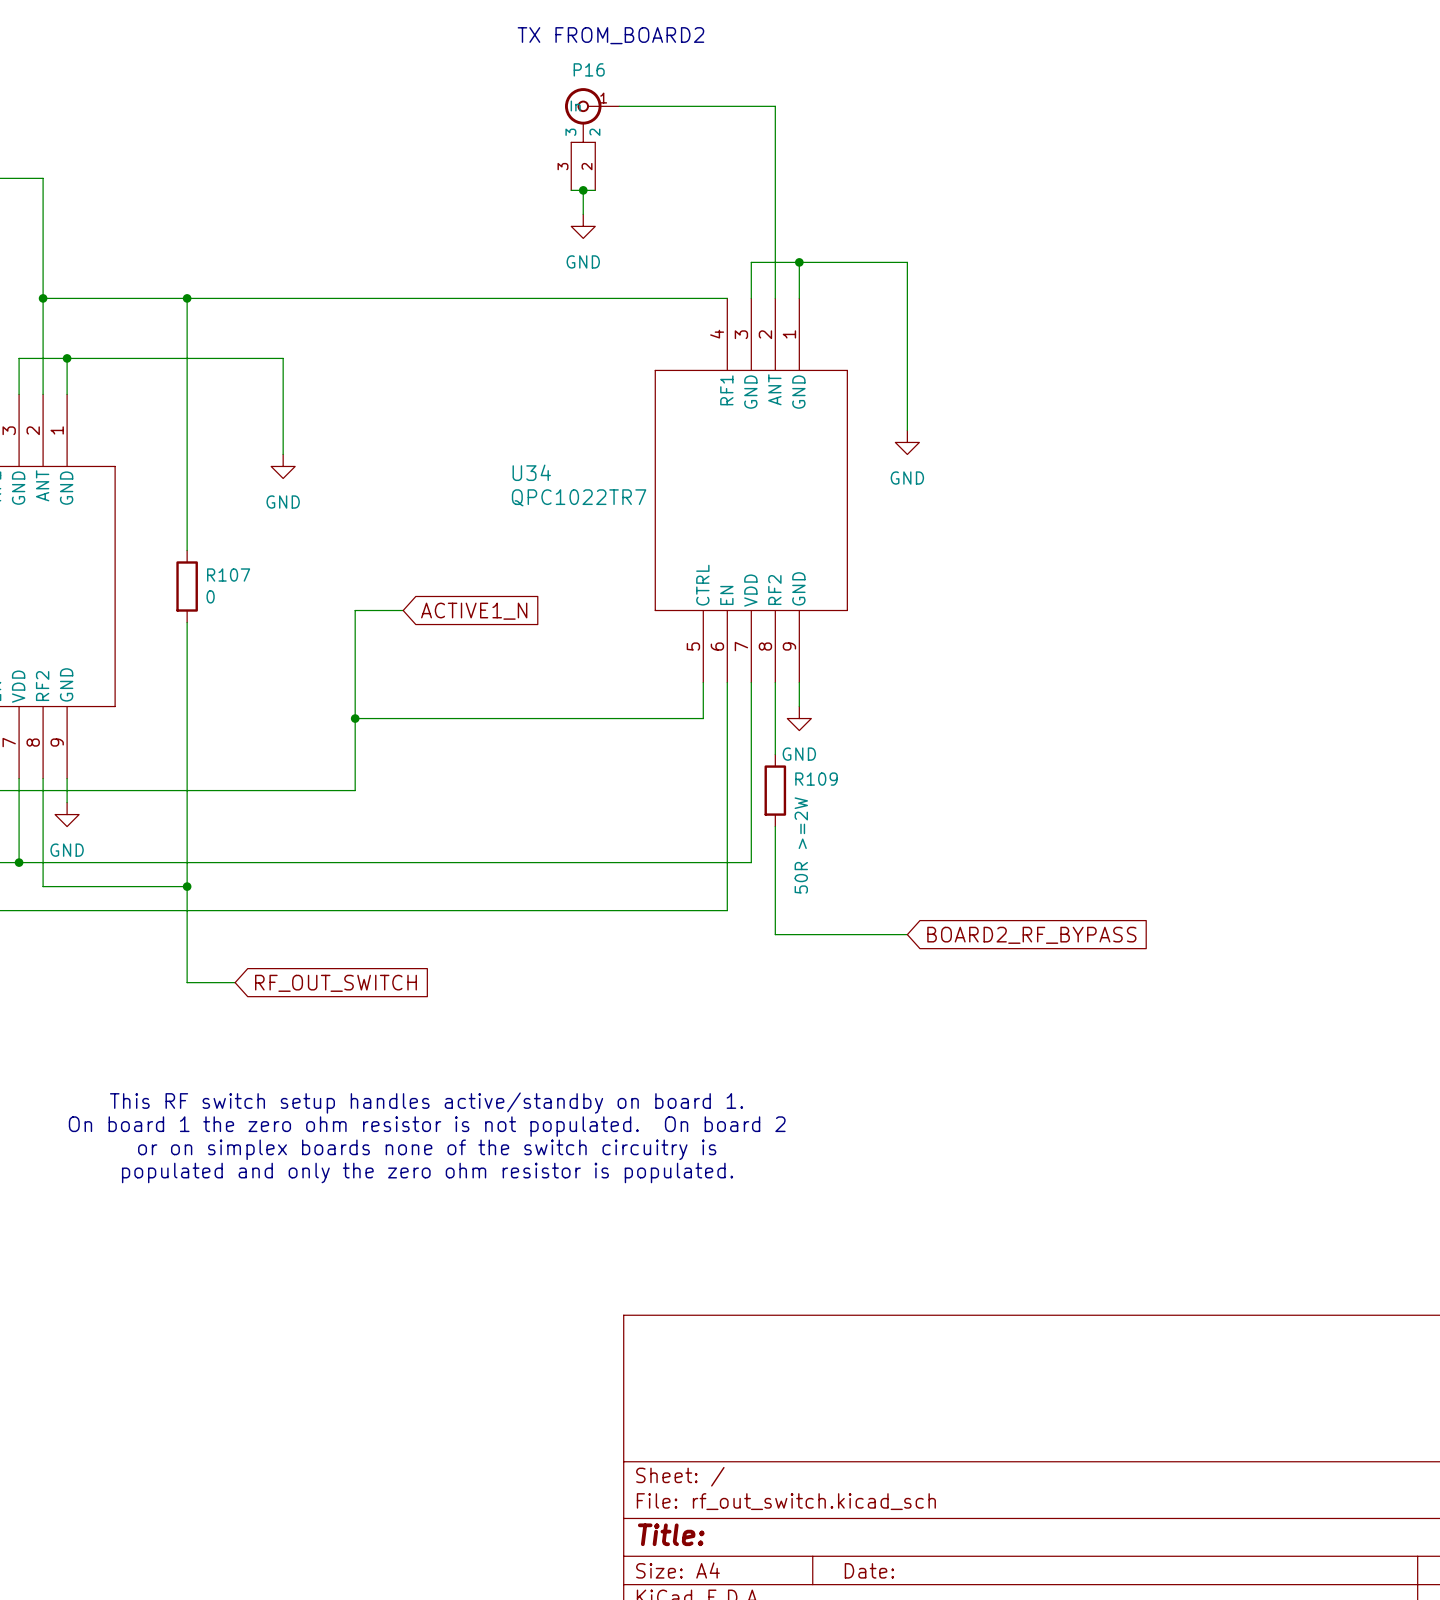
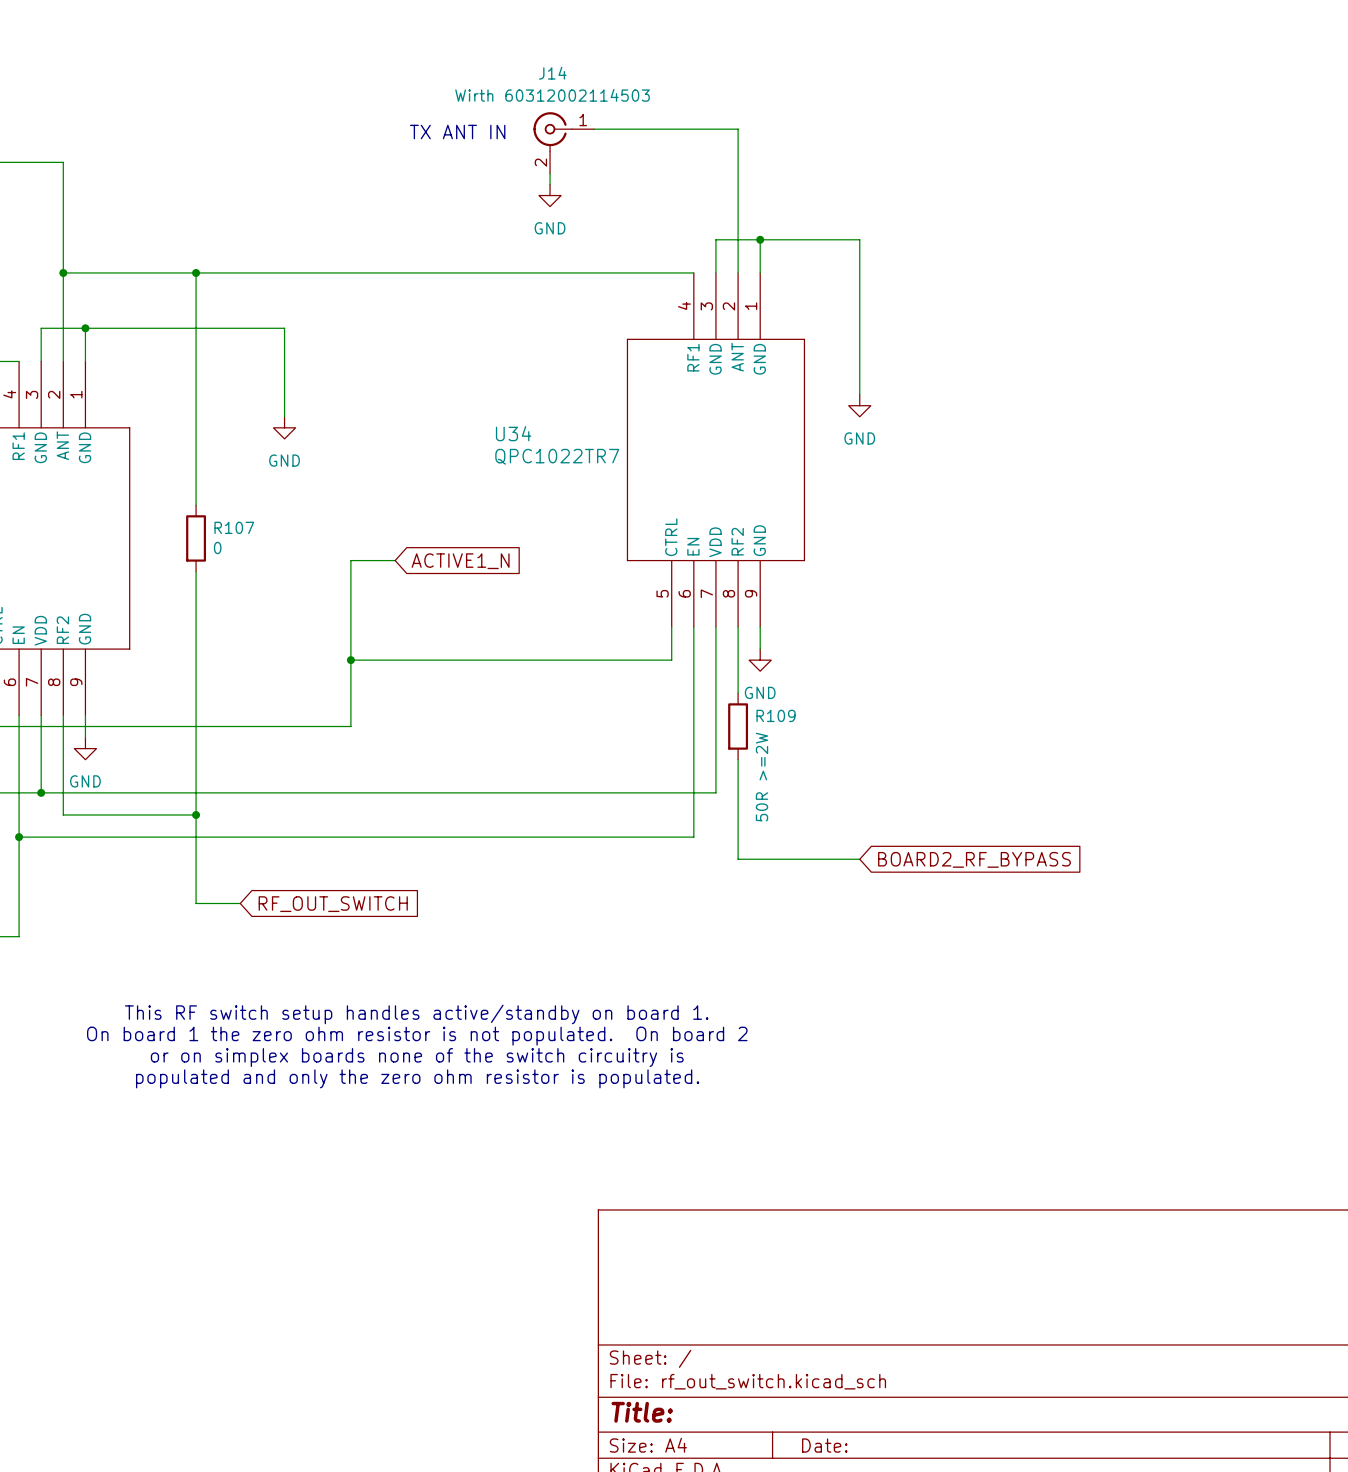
text: TX FROM_BOARD2 (610, 35) -> none
wire: (619, 106) (775, 106) (775, 142) -> (594, 129) (738, 129)
P16: (592, 139) -> none
text: none -> TX ANT IN (457, 132)
J14: none -> Wirth 60312002114503 (563, 142)
wire: (571, 190) (595, 190) -> (550, 173) (550, 184)
wire: (583, 190) (583, 214) -> none
junction: (583, 190) -> none
power symbol position: GND (583, 226) -> GND (550, 195)

